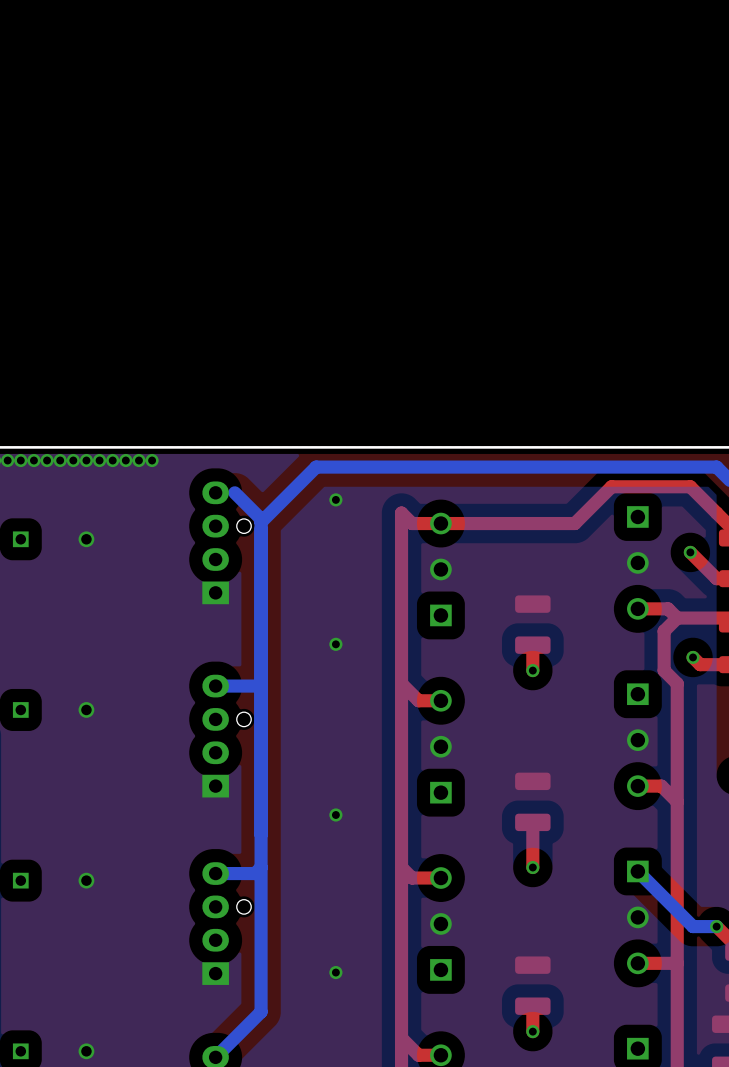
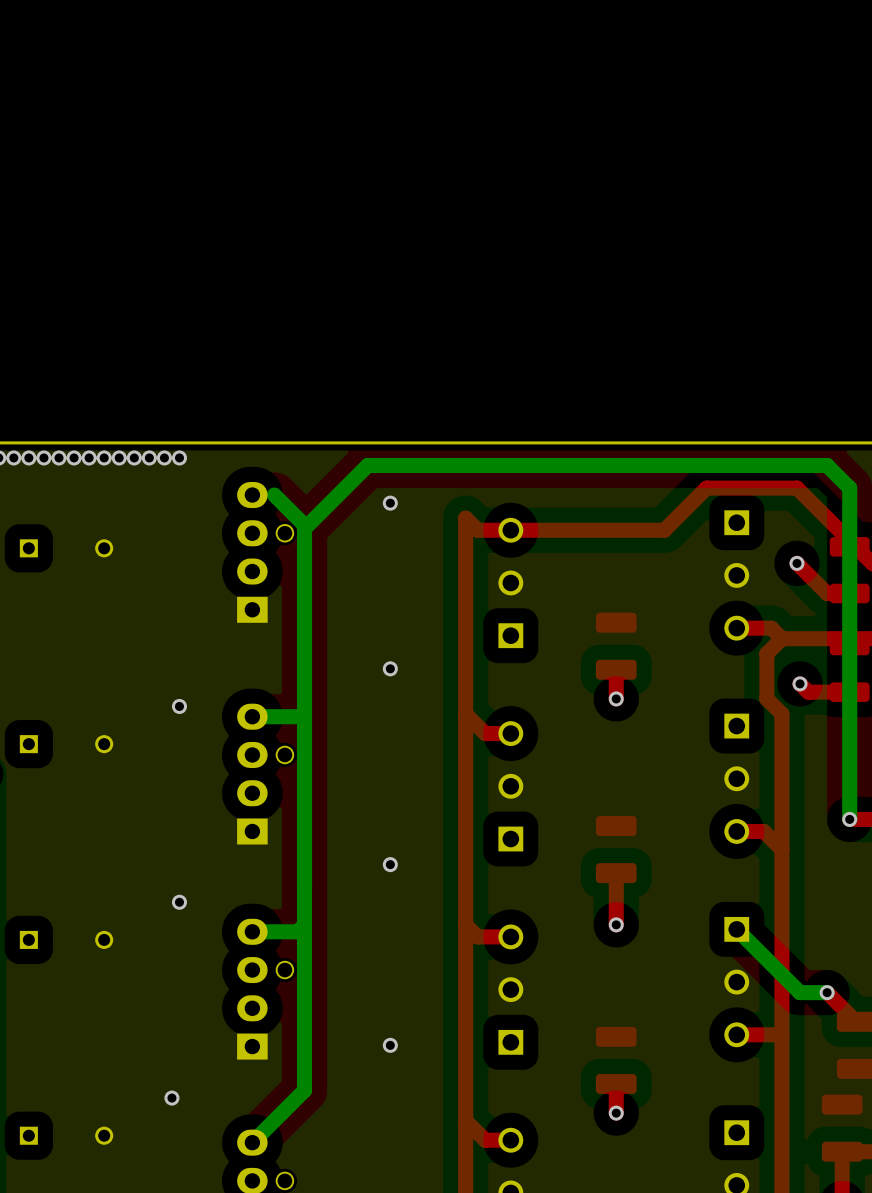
via: none -> (179, 706)
via: none -> (179, 902)
via: none -> (171, 1098)

